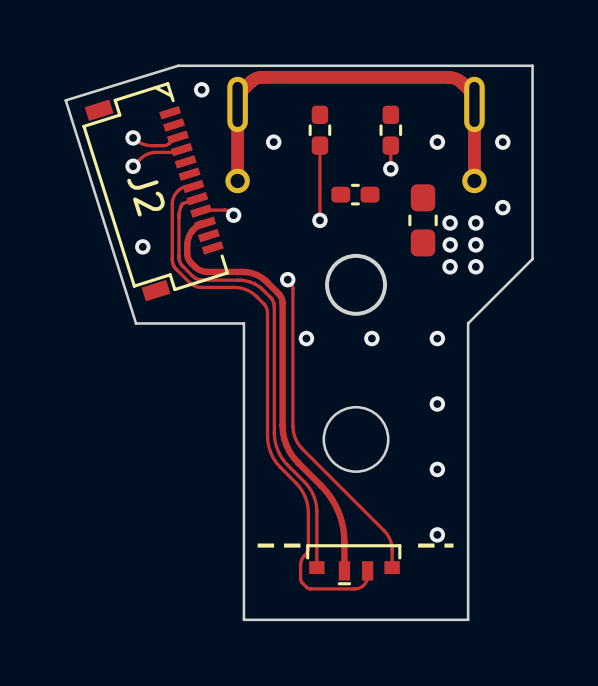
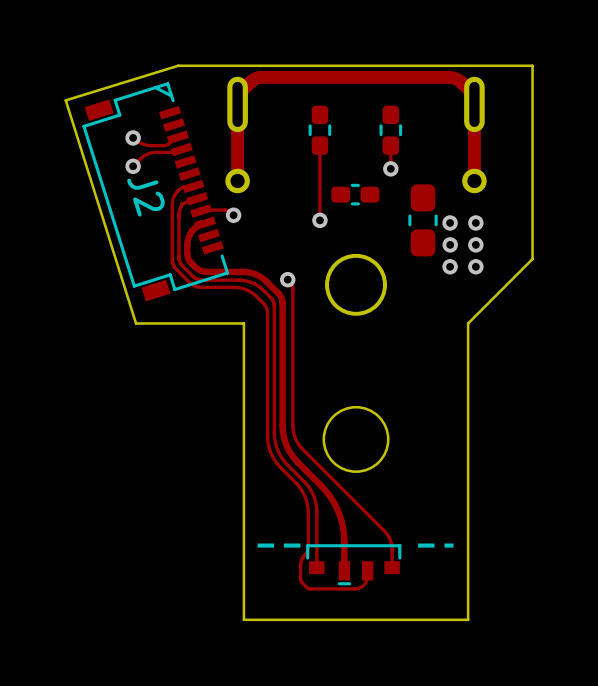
via: (201, 89) -> none
via: (273, 142) -> none
via: (437, 142) -> none
via: (502, 142) -> none
via: (502, 207) -> none
via: (142, 246) -> none
via: (306, 338) -> none
via: (371, 338) -> none
via: (437, 338) -> none
via: (437, 403) -> none
via: (437, 469) -> none
via: (437, 534) -> none

